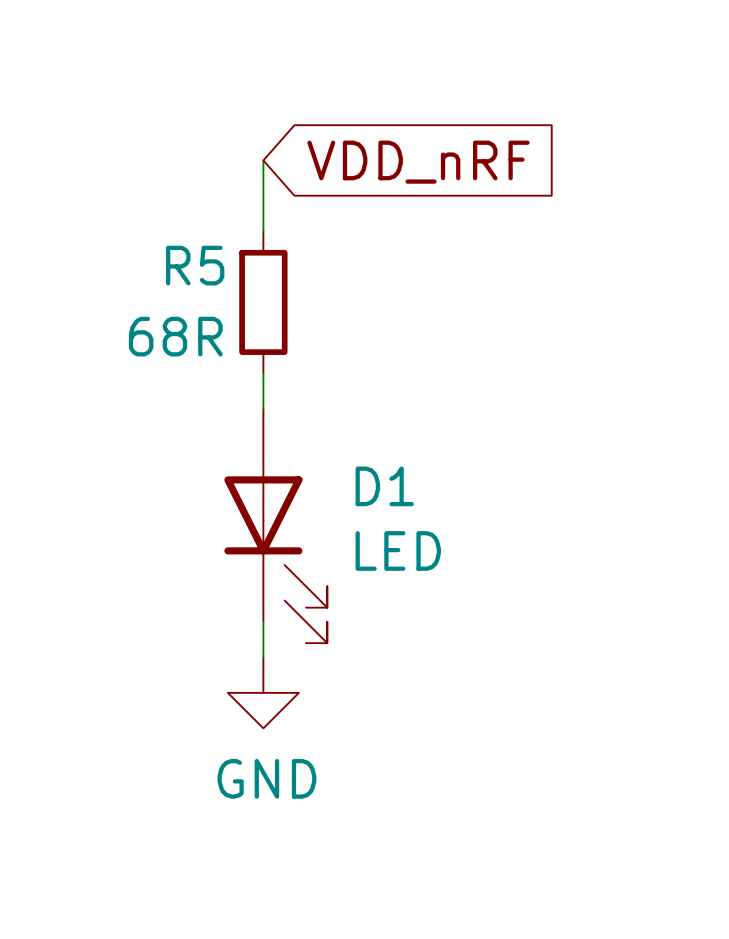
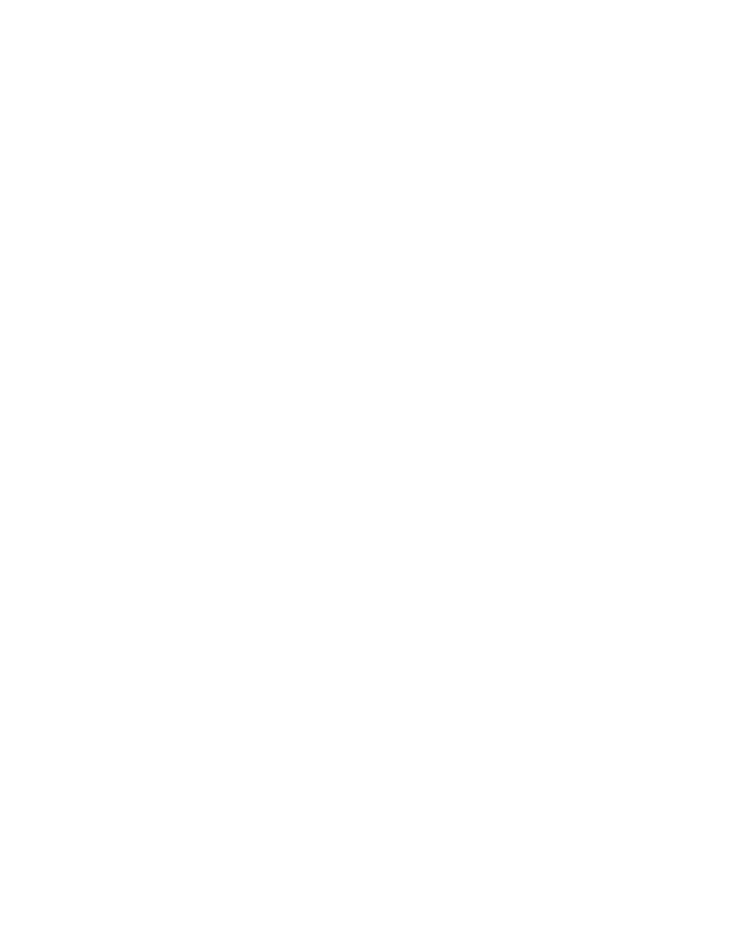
wire: (263, 160) (263, 231) -> none
global label: VDD_nRF (418, 162) -> none
R5: 68R (263, 302) -> none
wire: (263, 373) (263, 408) -> none
D1: LED (275, 526) -> none
wire: (263, 621) (263, 657) -> none
power symbol: GND (263, 692) -> none

